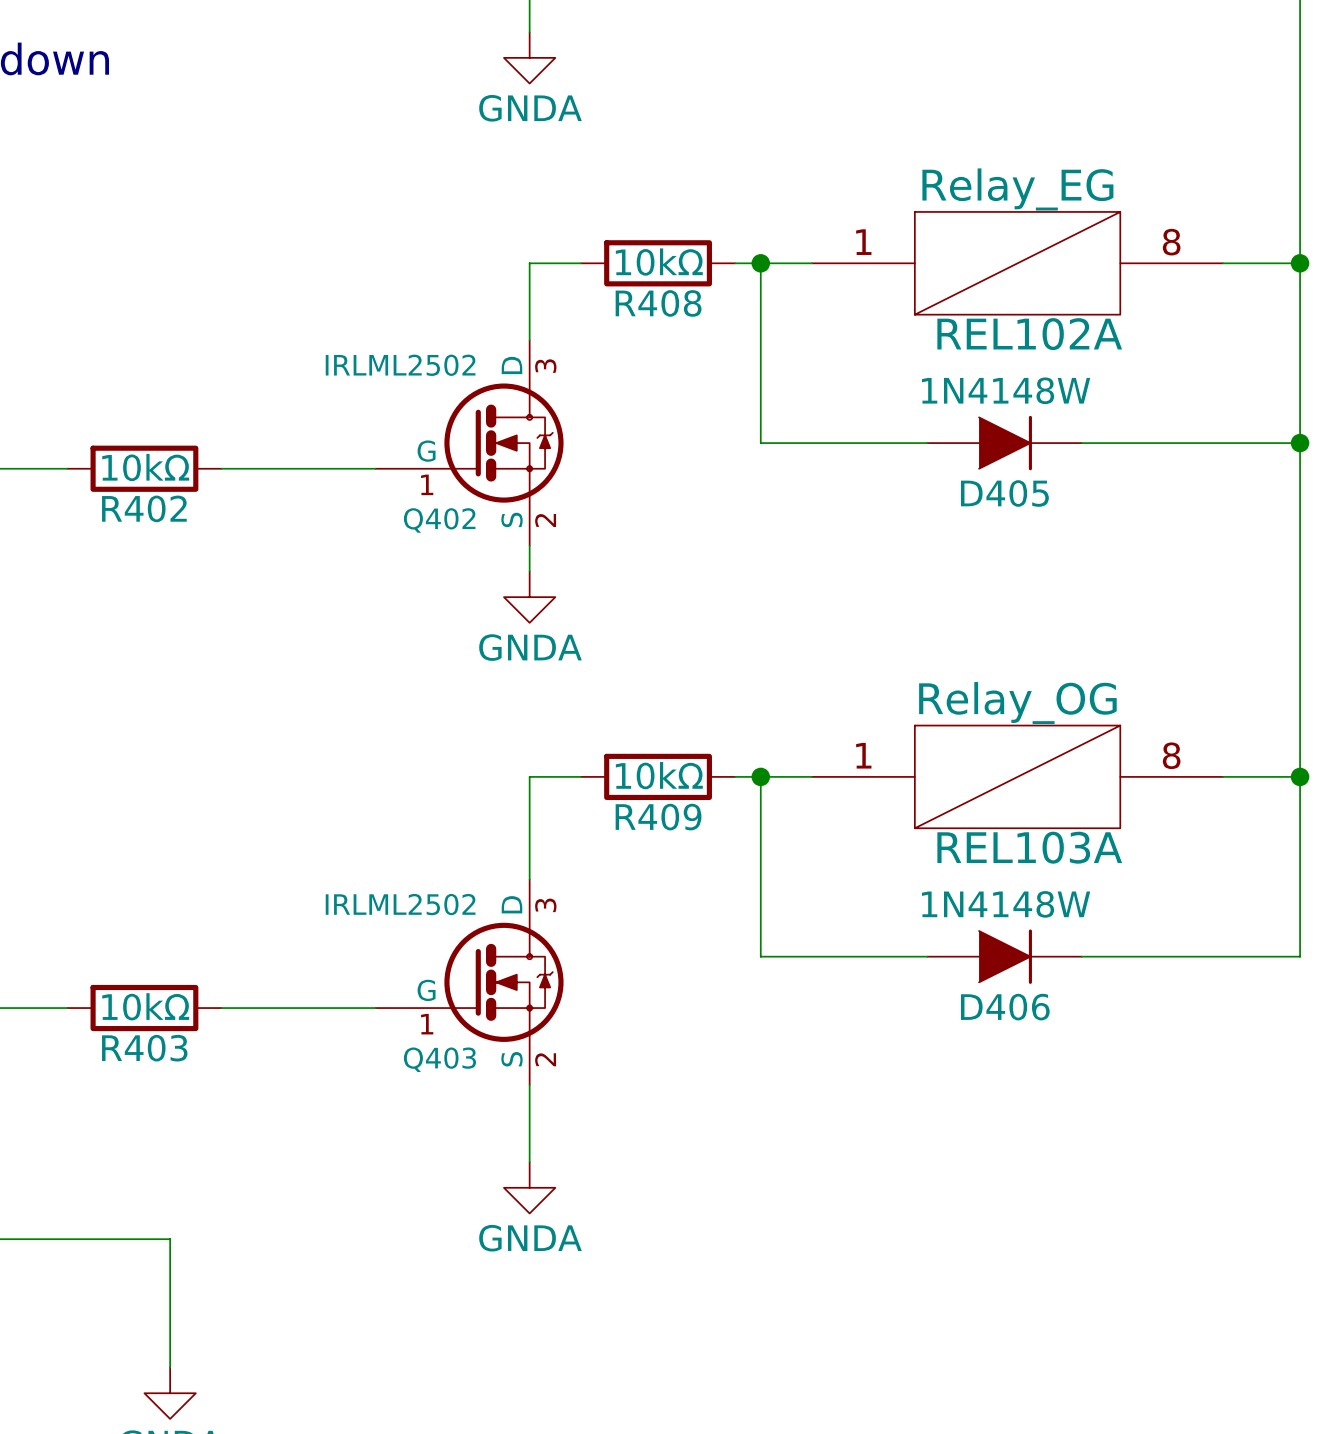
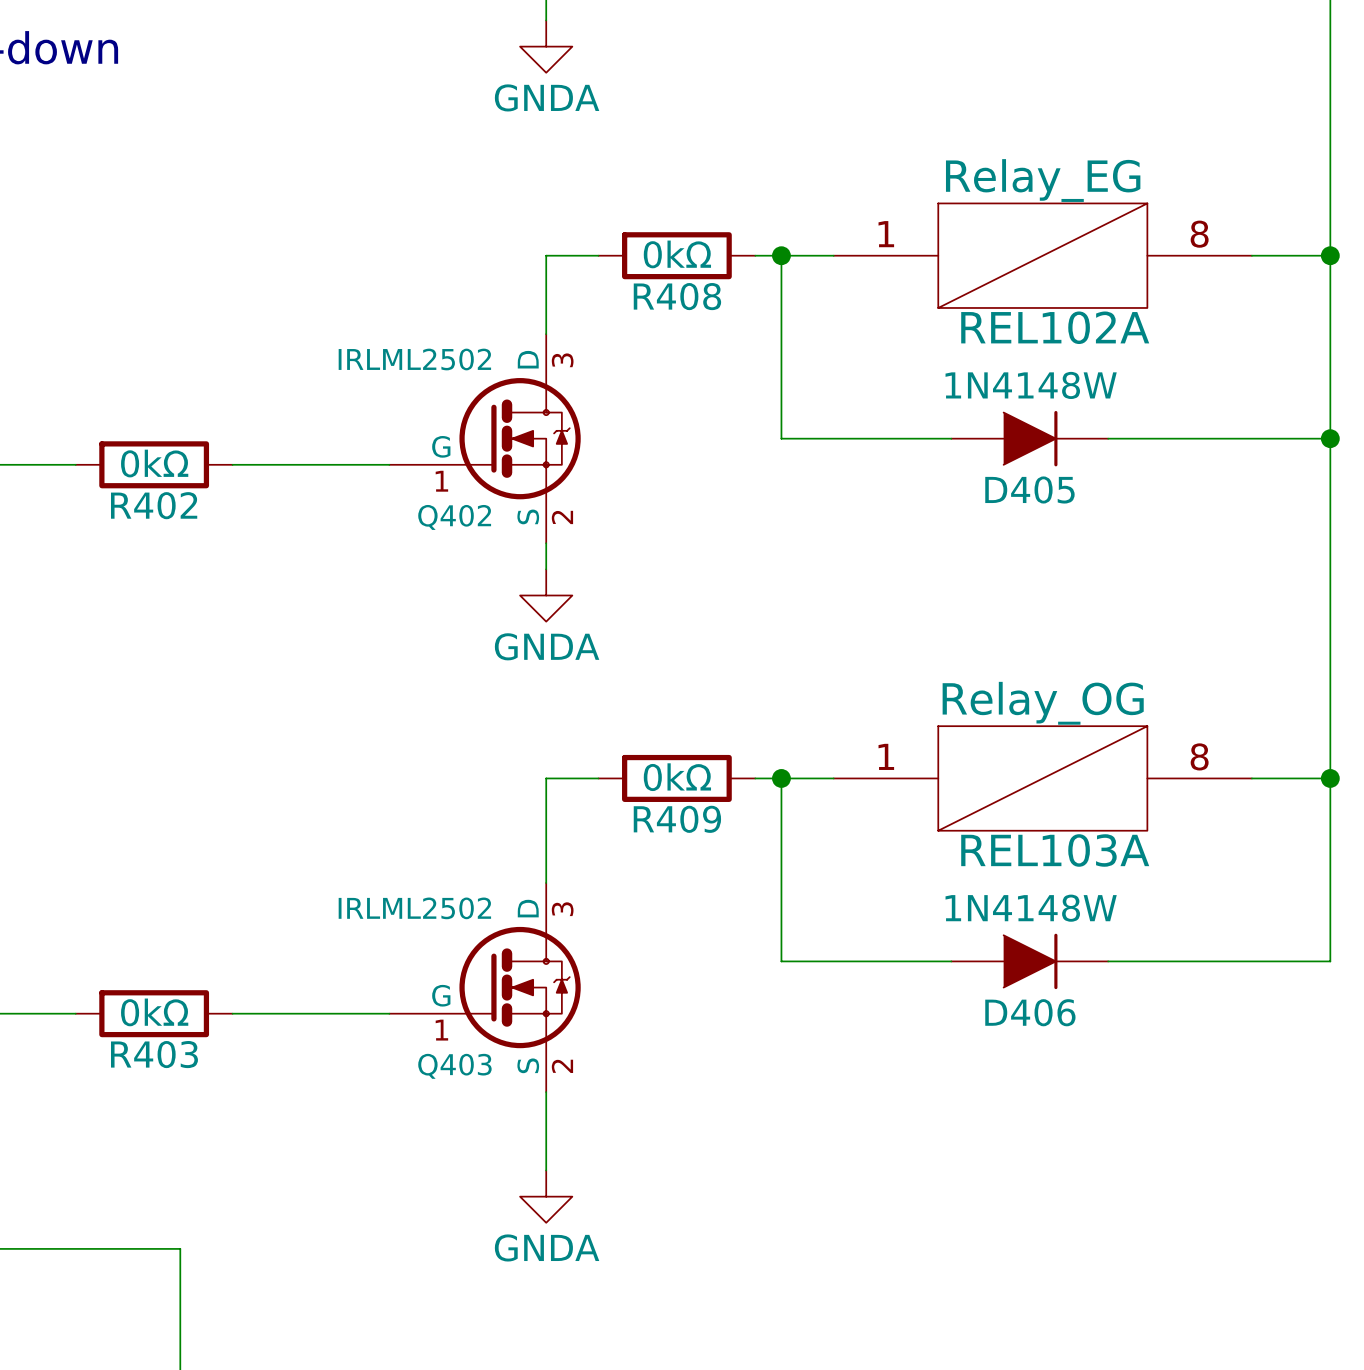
R408 value: 10kΩ (659, 262) -> 0kΩ (677, 254)
R402 value: 10kΩ (145, 467) -> 0kΩ (154, 463)
R409 value: 10kΩ (659, 775) -> 0kΩ (677, 777)
R403 value: 10kΩ (145, 1006) -> 0kΩ (154, 1012)

